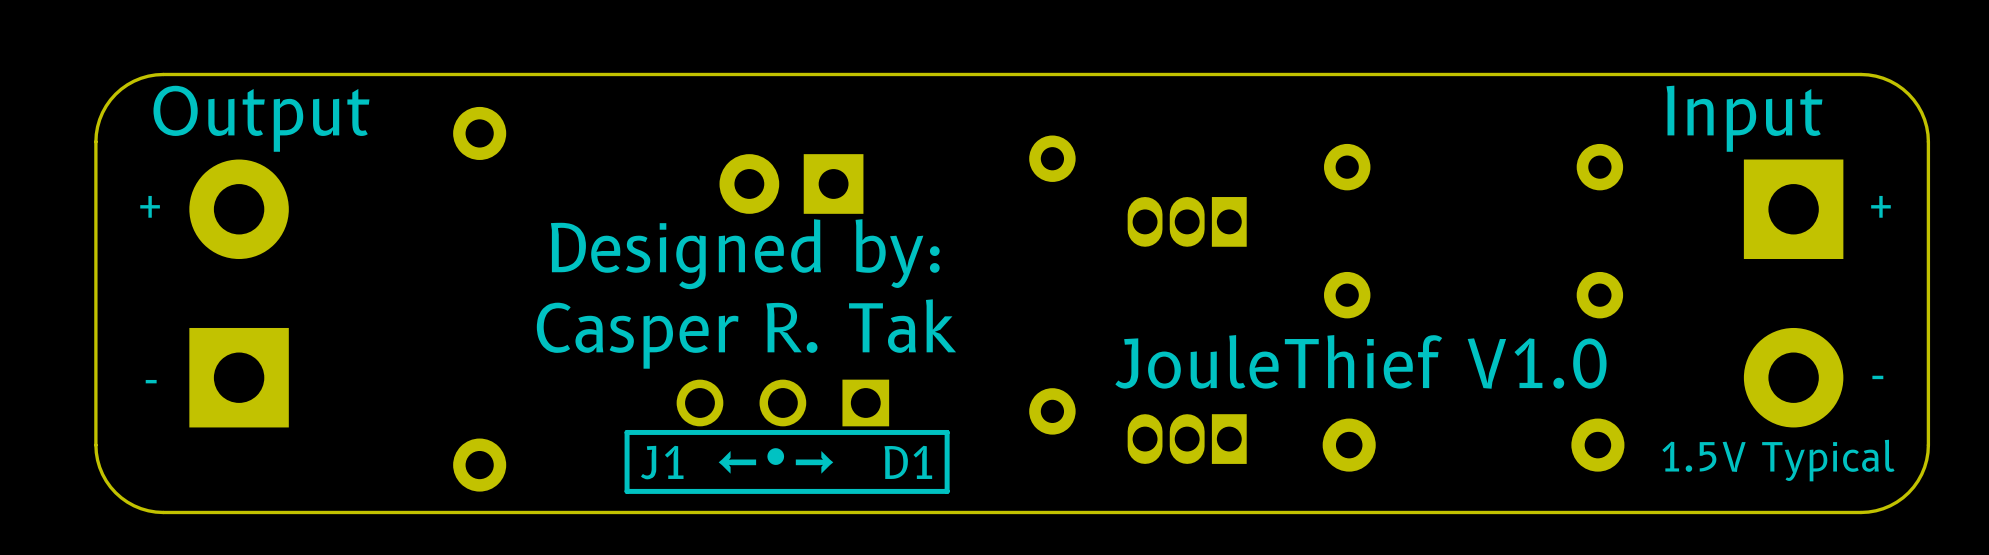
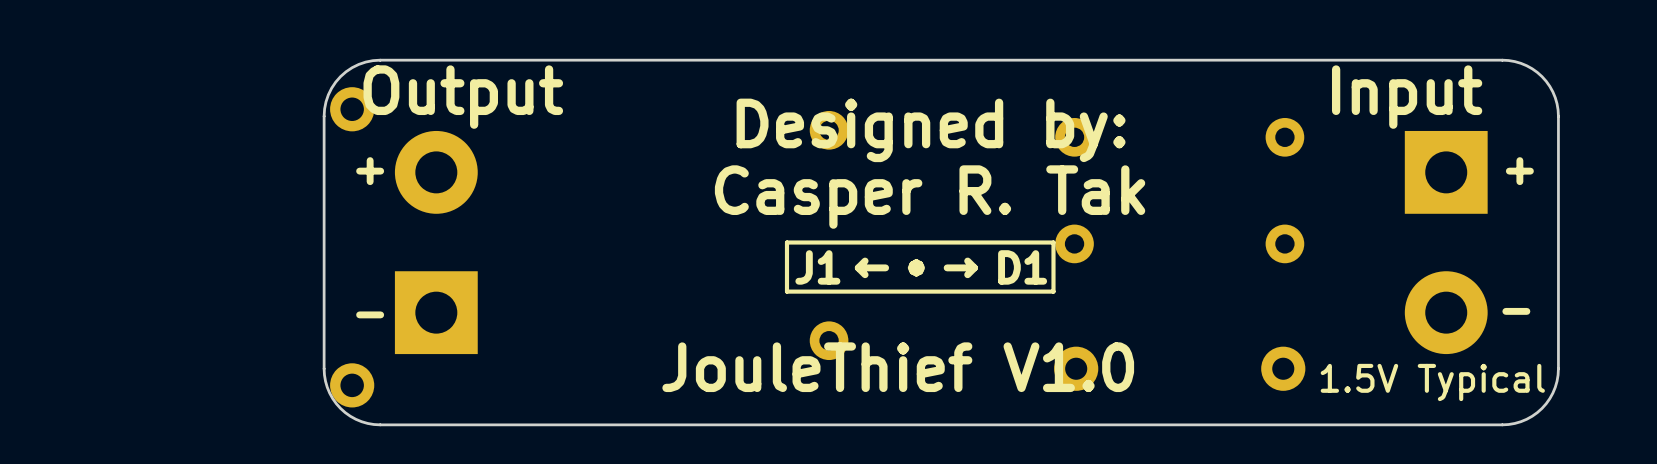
board edge: (513, 74) (155, 74) (134, 81) (115, 94) (102, 112) (97, 126) (95, 141) (96, 452) (99, 467) (106, 480) (121, 497) (141, 508) (163, 512) (513, 512) -> (380, 60) (358, 64) (340, 76) (328, 94) (324, 116) (325, 381) (332, 398) (345, 412) (361, 421) (380, 424)
text position: Output (261, 118) -> Output (463, 97)
part: (791, 183) -> none
text position: + (150, 206) -> + (370, 171)
part: (1187, 221) -> none
text position: Designed by: (745, 254) -> Designed by: (931, 130)
part position: (239, 293) -> (436, 242)
text position: Casper R. Tak (746, 334) -> Casper R. Tak (930, 197)
text position: JouleThief V1.0 (1360, 361) -> JouleThief V1.0 (898, 367)
text position: - (151, 381) -> - (370, 314)
part: (782, 402) -> none
line: (947, 432) (947, 491) (627, 491) (627, 432) (947, 432) -> (1053, 242) (1053, 291) (786, 291) (786, 242) (1053, 242)
part: (1187, 439) -> none
text position: ←•→ (775, 460) -> ←•→ (916, 267)
text position: J1 (662, 462) -> J1 (817, 267)
text position: D1 (908, 462) -> D1 (1022, 267)

